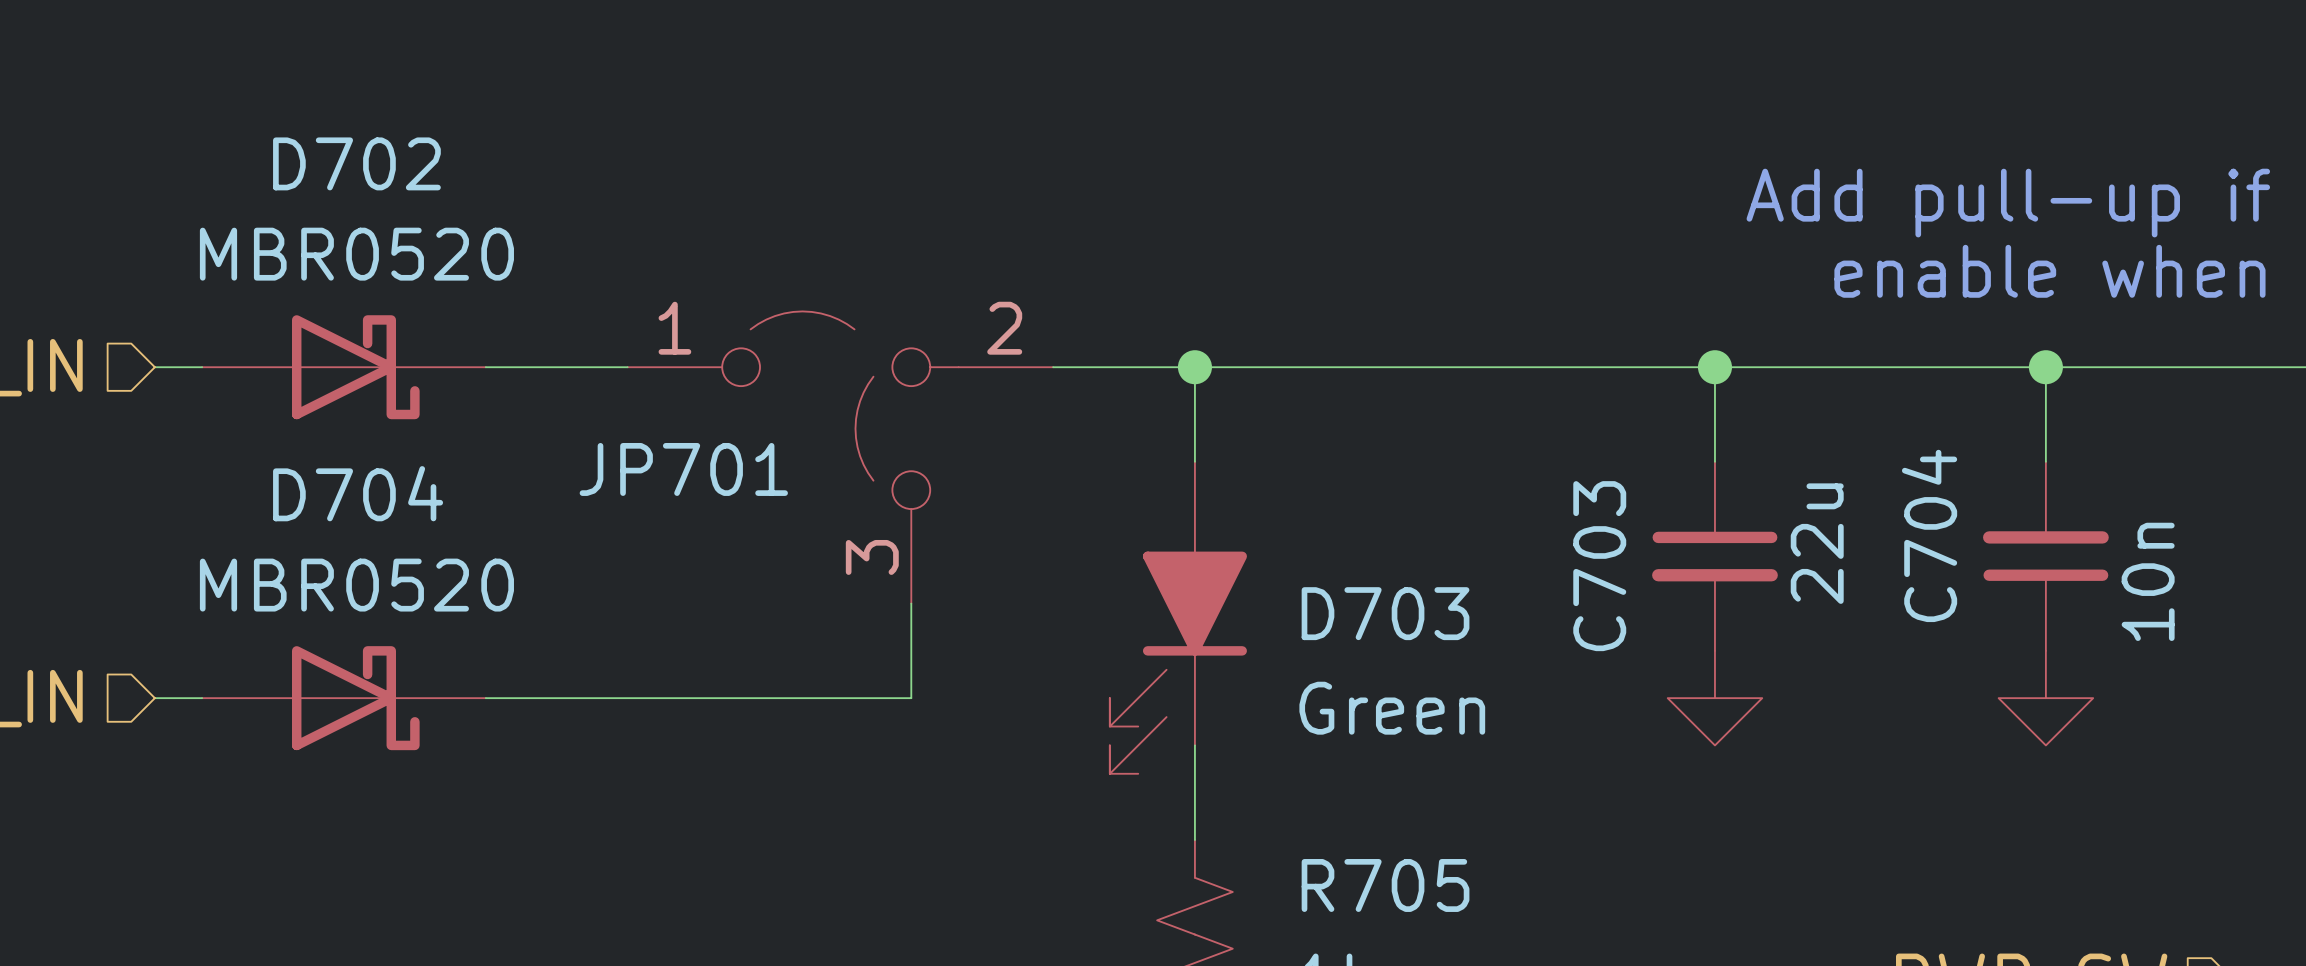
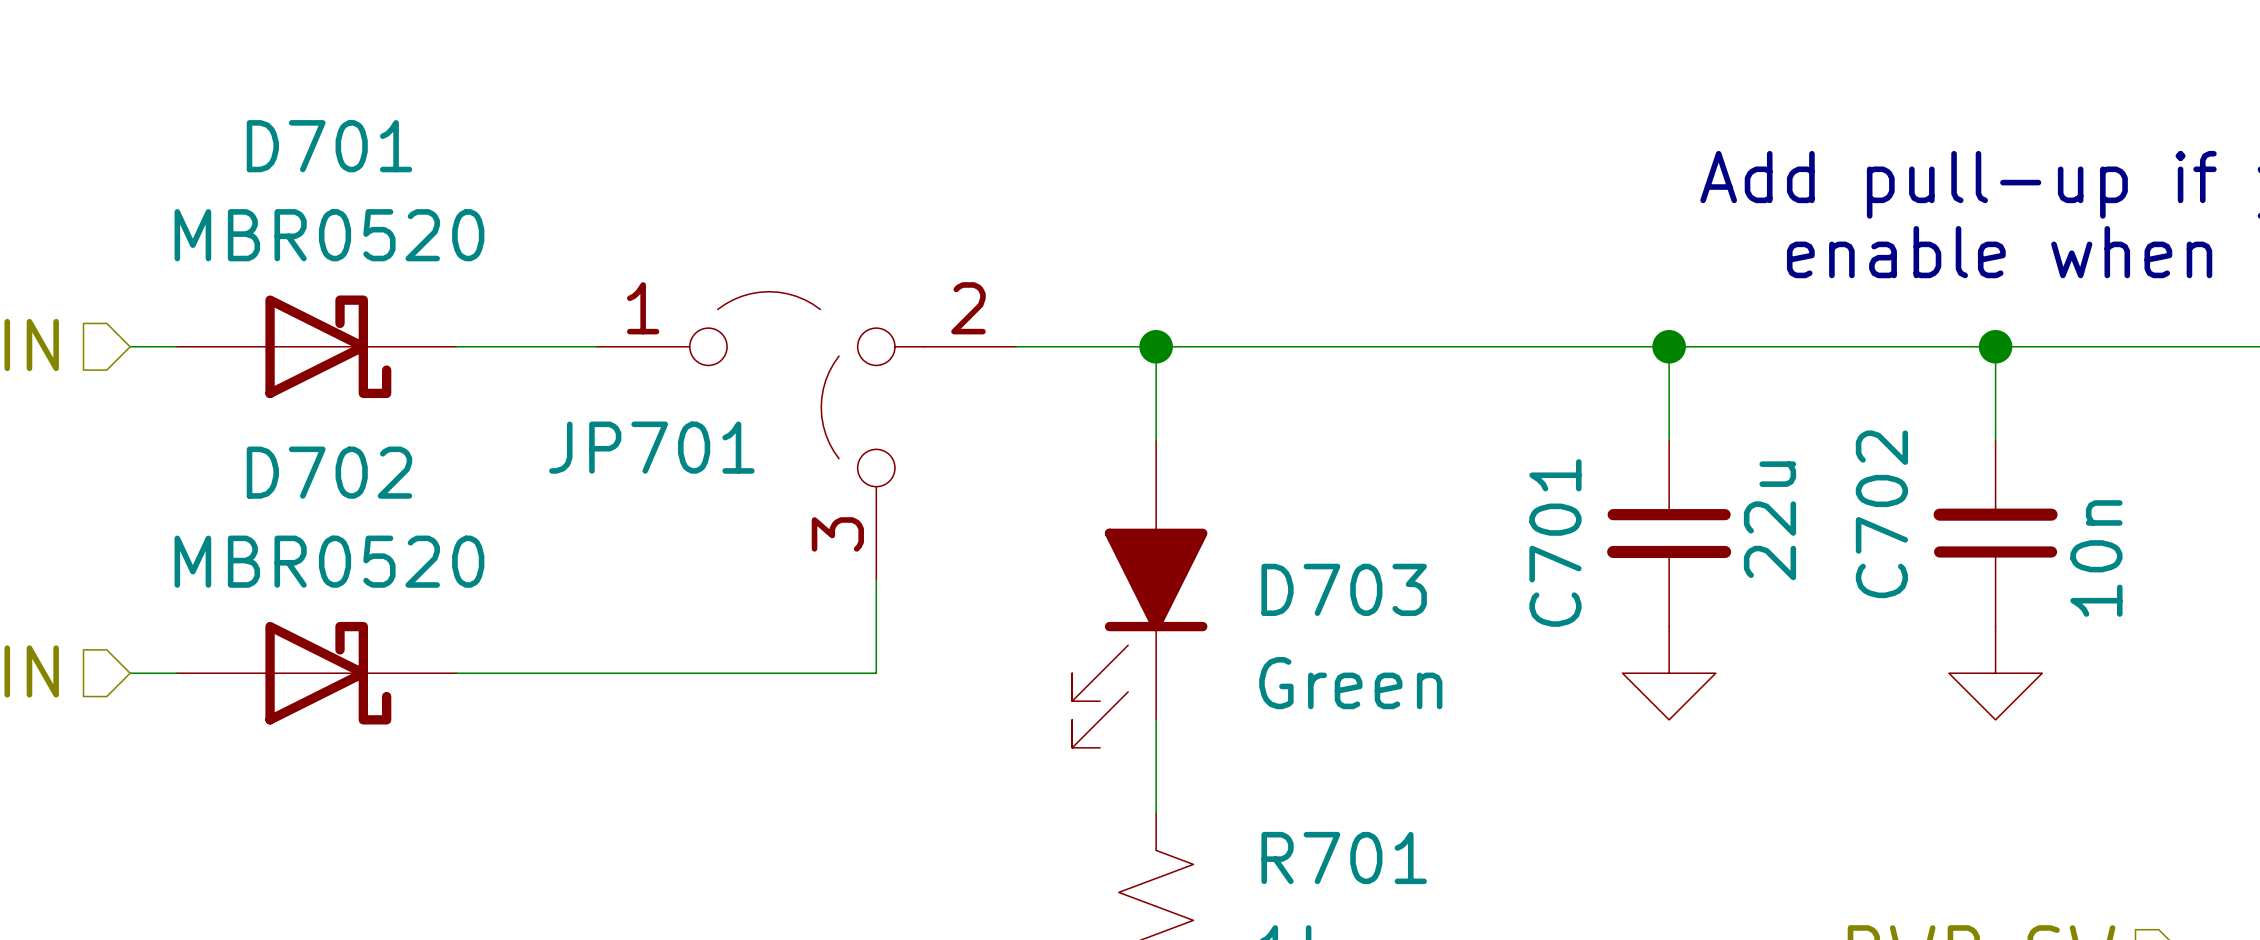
D702 name: D702 (356, 163) -> D701 (329, 146)
D704 name: D704 (358, 493) -> D702 (329, 472)
C704 name: C704 (1929, 535) -> C702 (1881, 514)
C703 name: C703 (1599, 566) -> C701 (1555, 542)
R705 name: R705 (1385, 885) -> R701 (1344, 858)

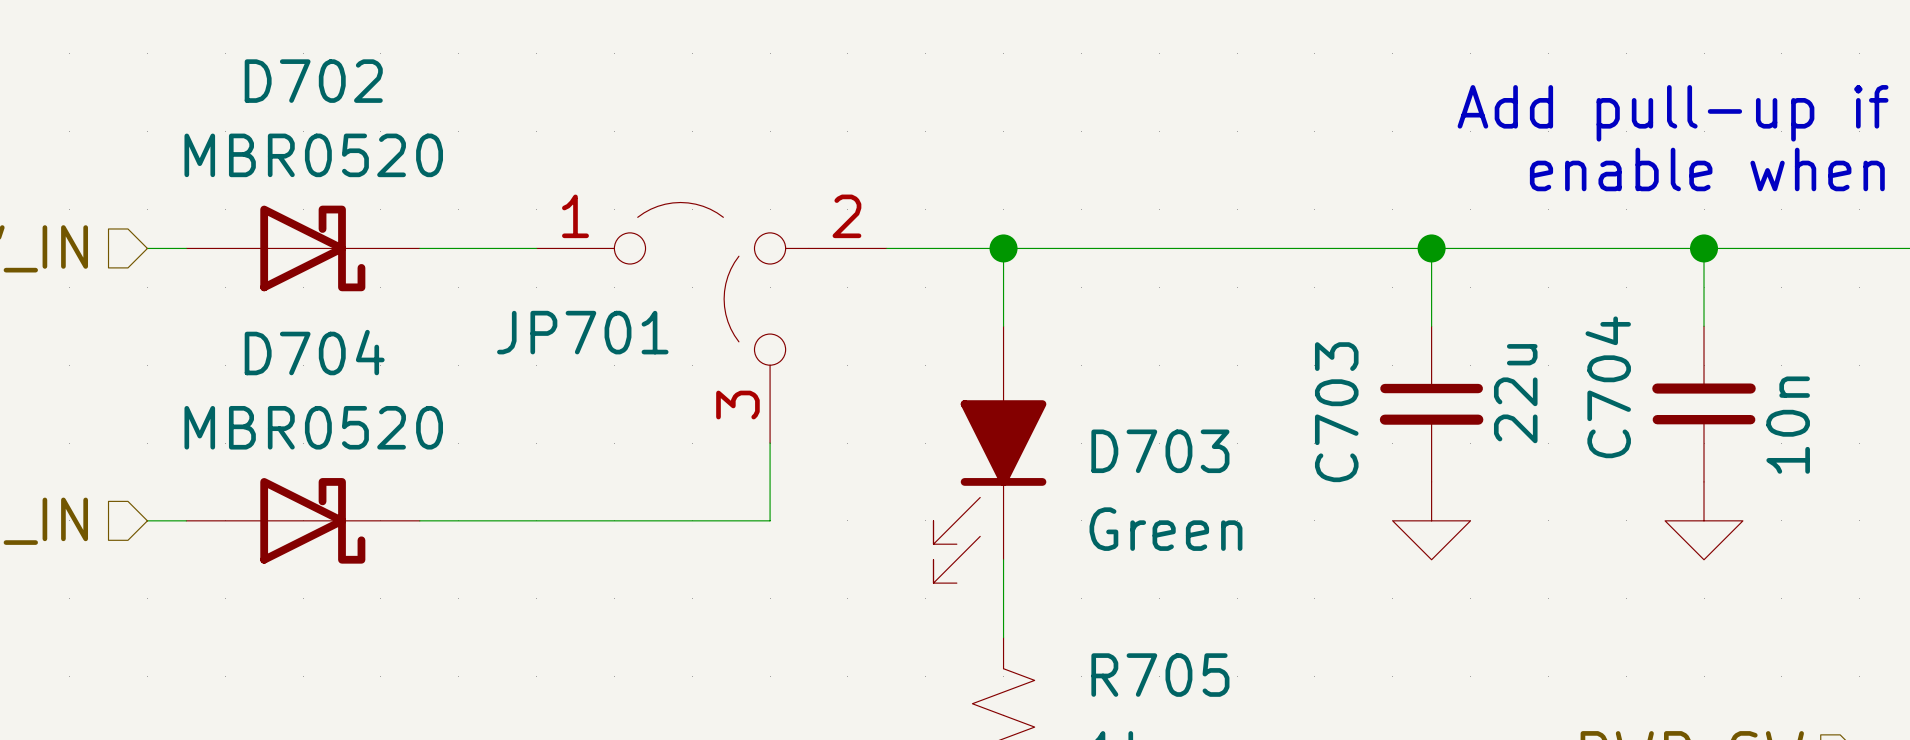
D701 name: D701 (329, 146) -> D702 (313, 81)
D702 name: D702 (329, 472) -> D704 (314, 352)
C702 name: C702 (1881, 514) -> C704 (1608, 387)
C701 name: C701 (1555, 542) -> C703 (1336, 412)
R701 name: R701 (1344, 858) -> R705 (1160, 675)

